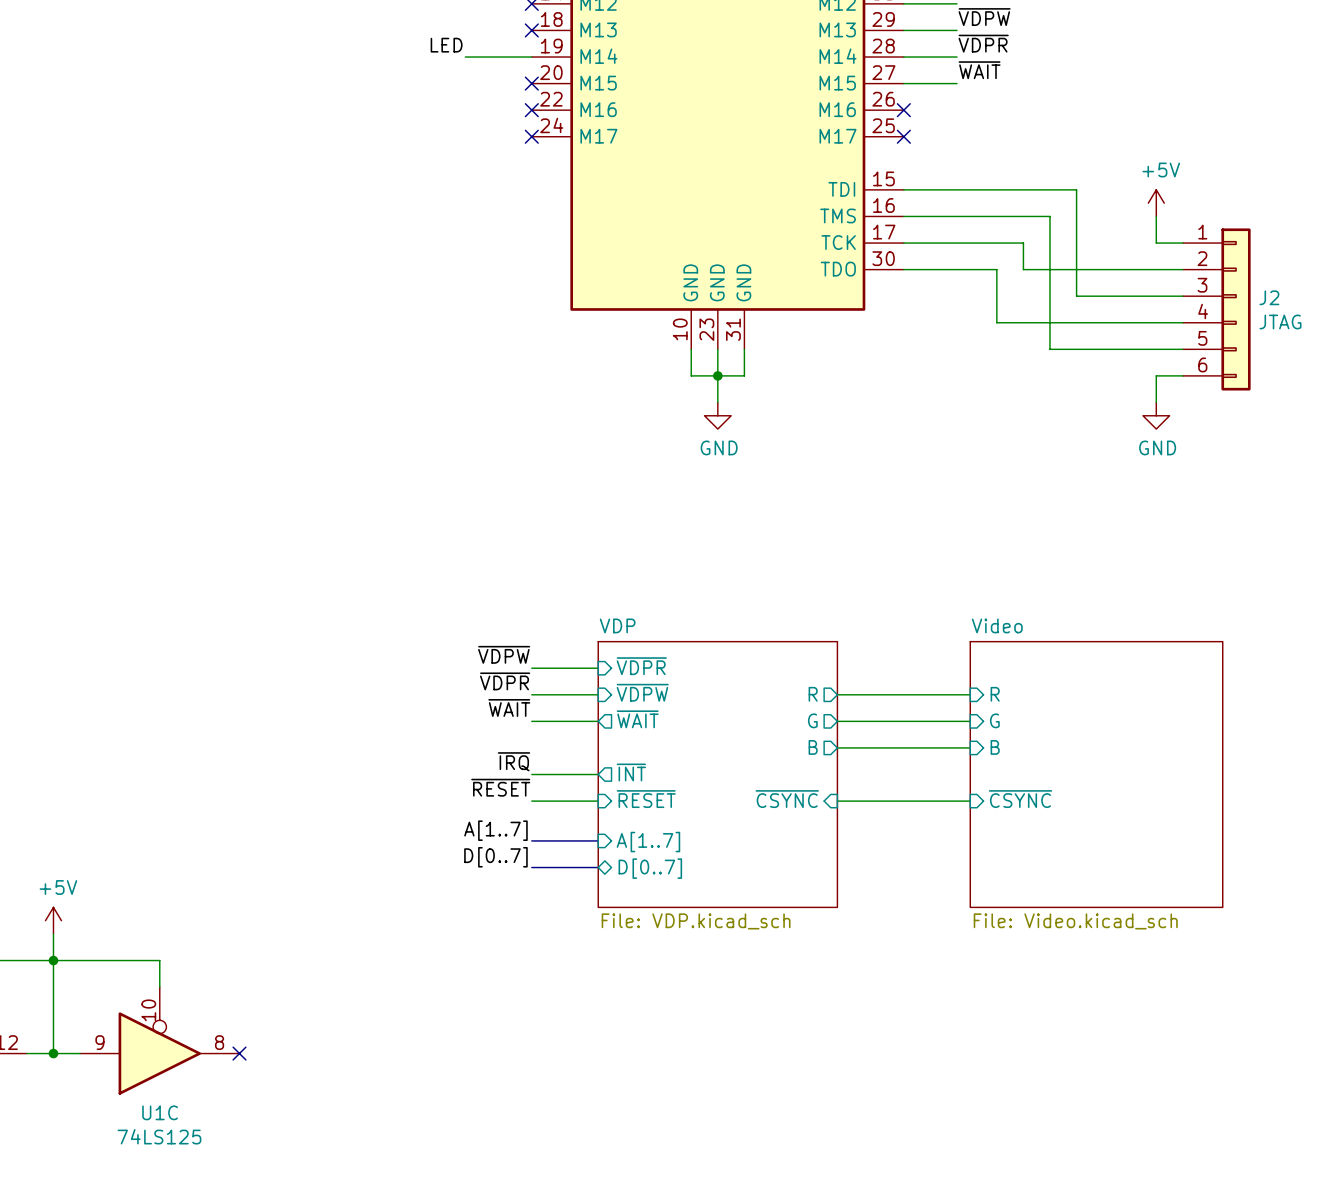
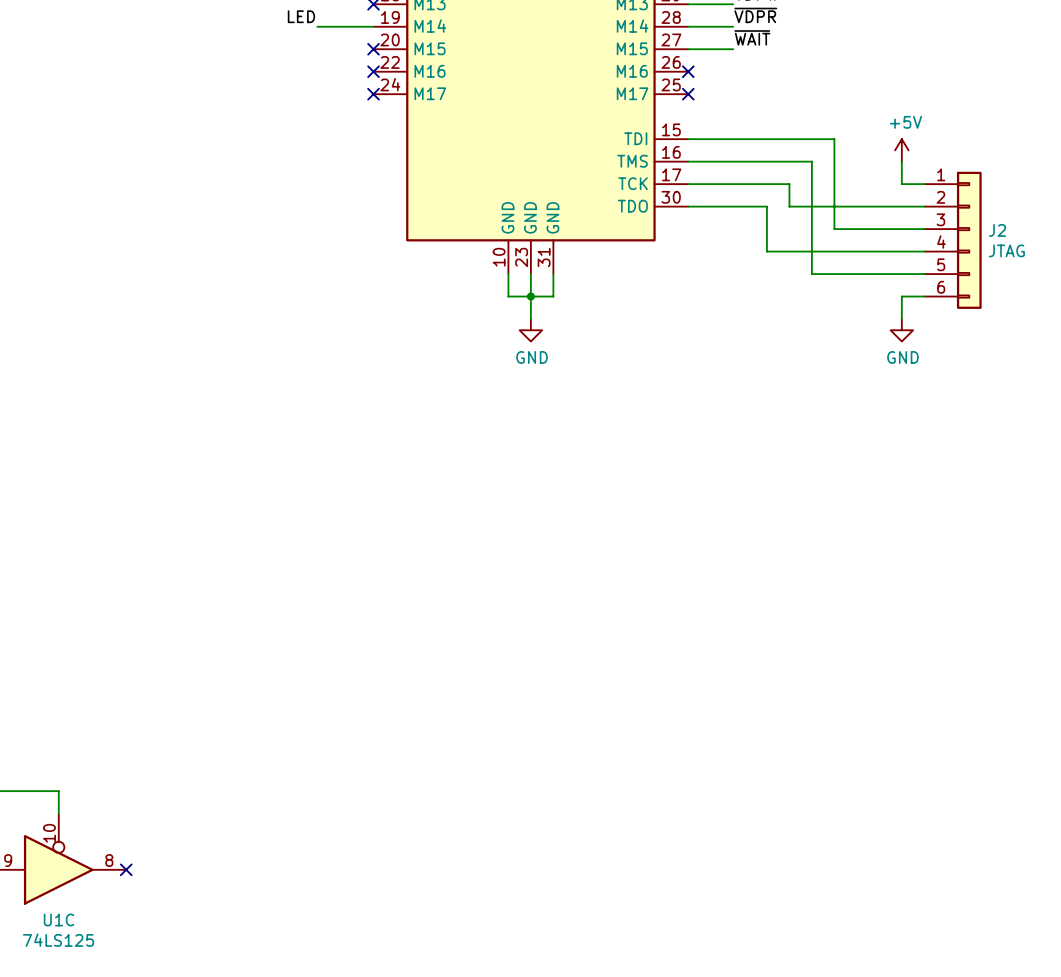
label: ~{VDPW} (504, 654) -> none
sheet pin: ~{VDPR} (641, 666) -> none
wire: (531, 668) (598, 668) -> none
label: ~{VDPR} (505, 681) -> none
sheet pin: ~{VDPW} (642, 692) -> none
wire: (531, 694) (598, 694) -> none
sheet pin: R (813, 694) -> none
wire: (837, 694) (970, 694) -> none
sheet pin: R (995, 694) -> none
label: ~{WAIT} (509, 707) -> none
sheet pin: ~{WAIT} (637, 719) -> none
sheet pin: G (812, 720) -> none
sheet pin: G (994, 720) -> none
wire: (531, 721) (598, 721) -> none
wire: (837, 721) (970, 721) -> none
sheet pin: B (813, 747) -> none
wire: (837, 747) (970, 747) -> none
sheet pin: B (995, 747) -> none
label: ~{IRQ} (513, 761) -> none
sheet pin: ~{INT} (631, 772) -> none
wire: (531, 774) (598, 774) -> none
sheet VDP: File: VDP.kicad_sch (717, 774) -> none
sheet Video: File: Video.kicad_sch (1096, 774) -> none
label: ~{RESET} (500, 787) -> none
sheet pin: ~{RESET} (646, 799) -> none
sheet pin: ~{CSYNC} (787, 799) -> none
sheet pin: ~{CSYNC} (1020, 799) -> none
wire: (531, 801) (598, 801) -> none
wire: (837, 801) (970, 801) -> none
label: A[1..7] (495, 830) -> none
bus: (531, 840) (598, 840) -> none
sheet pin: A[1..7] (648, 842) -> none
label: D[0..7] (495, 857) -> none
bus: (531, 867) (598, 867) -> none
sheet pin: D[0..7] (650, 868) -> none

